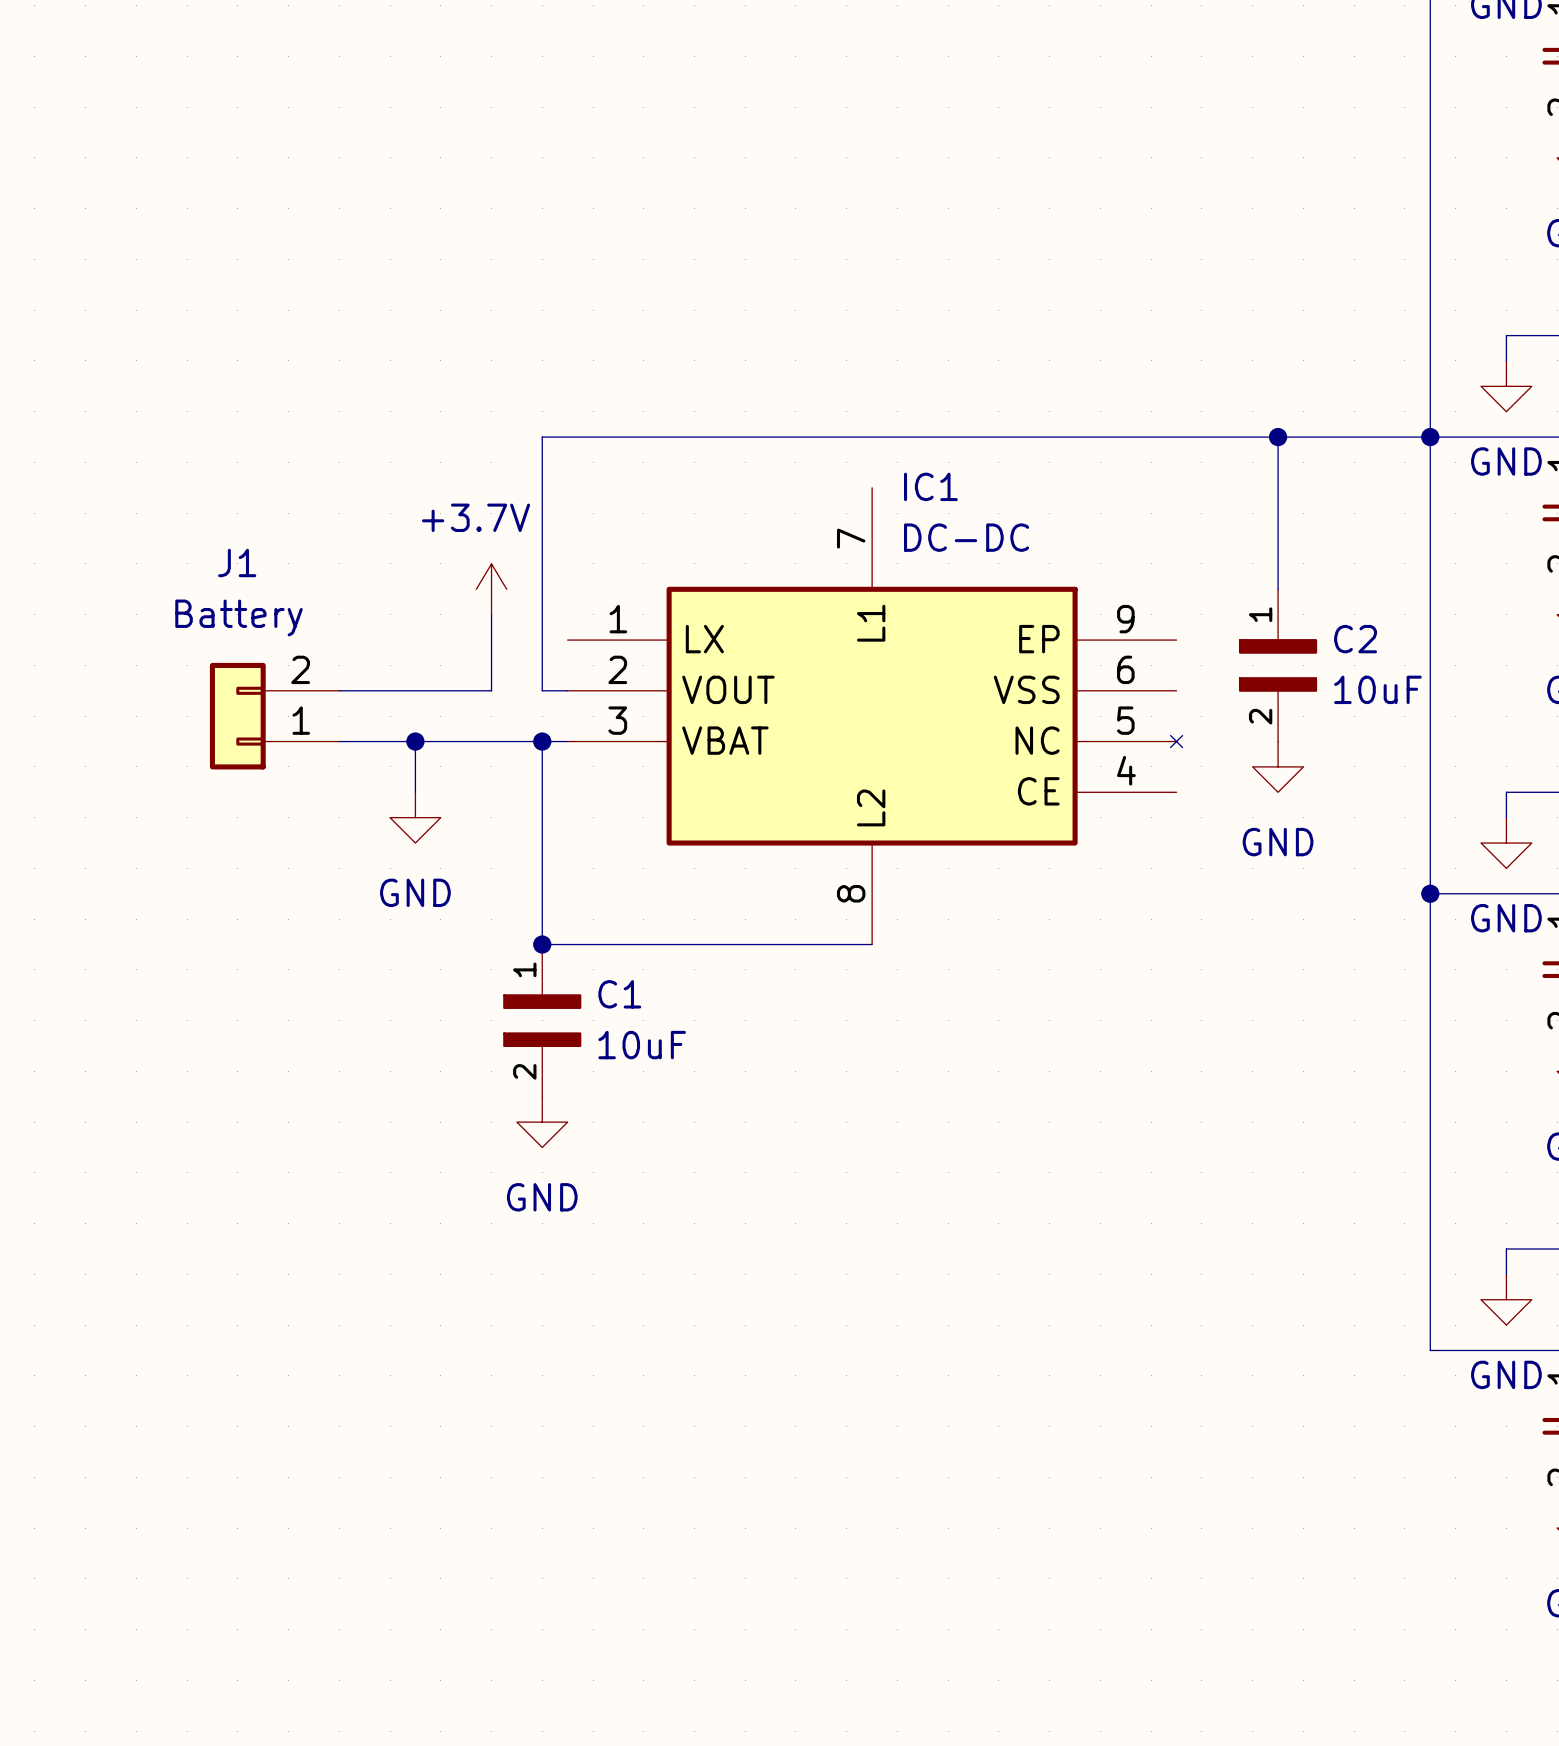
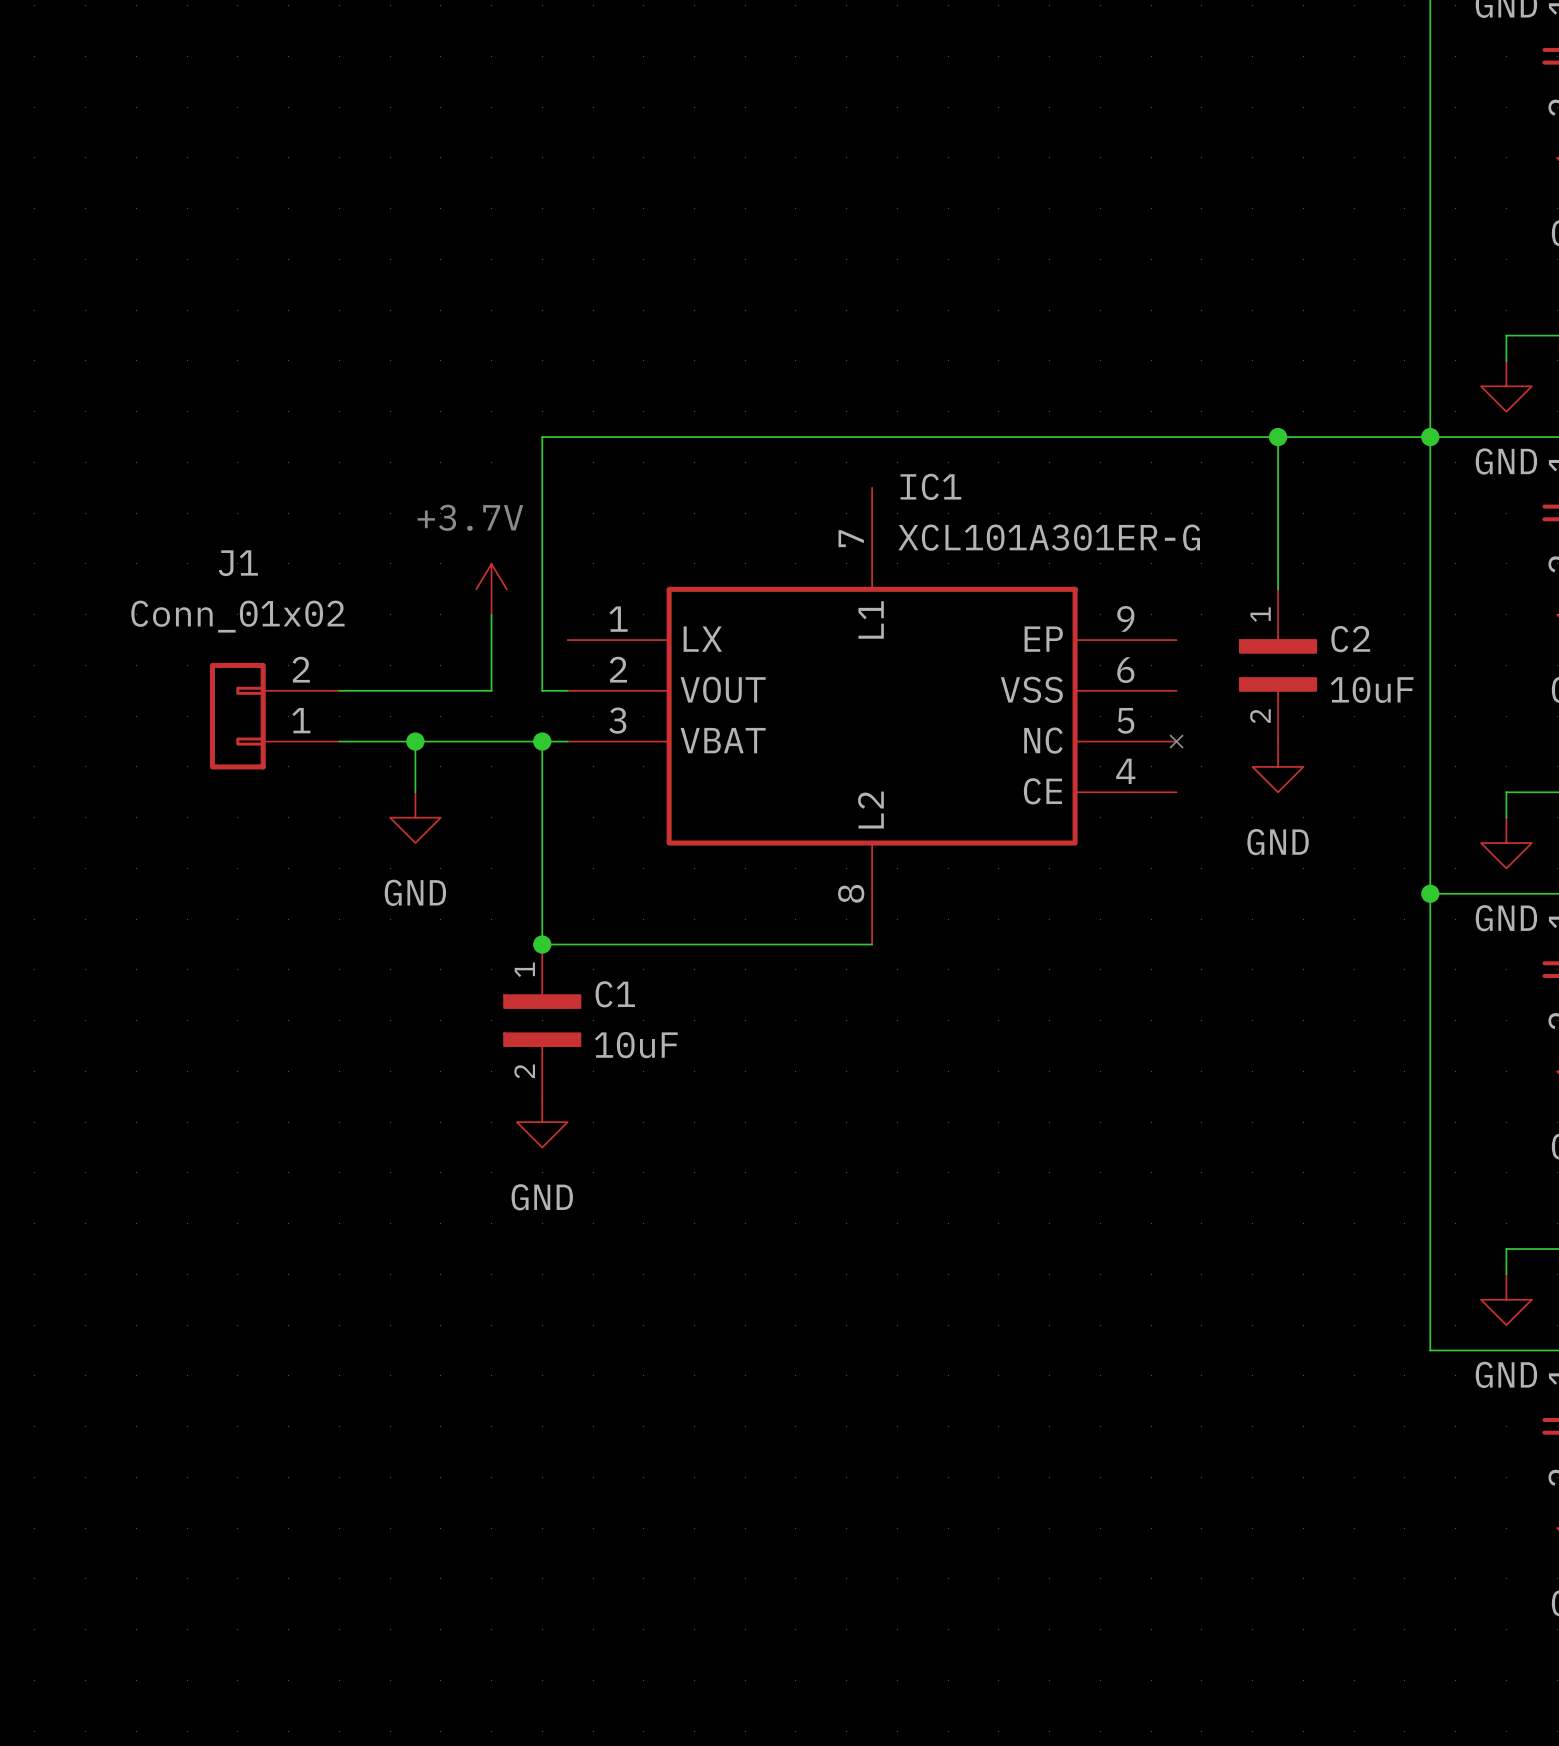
IC1 value: DC-DC (966, 537) -> XCL101A301ER-G (1049, 537)
J1 value: Battery (239, 617) -> Conn_01x02 (237, 616)

